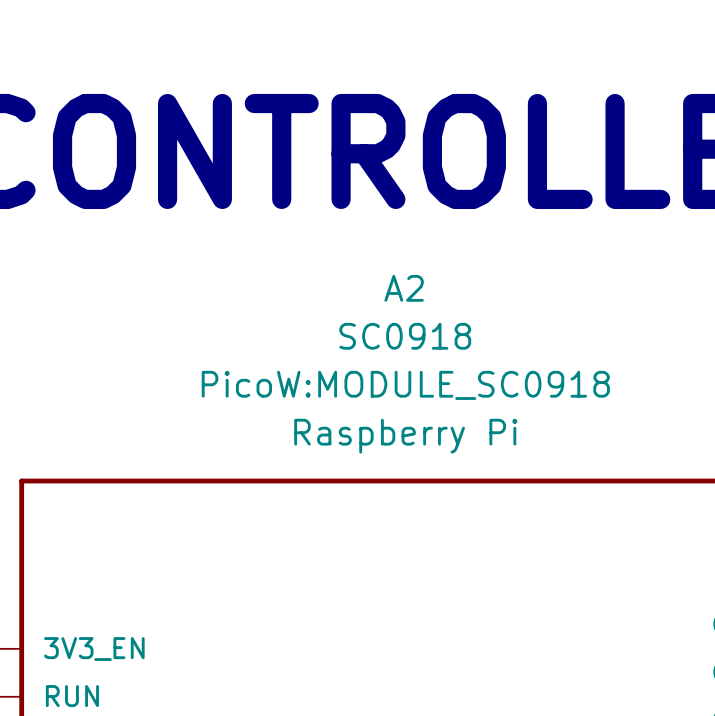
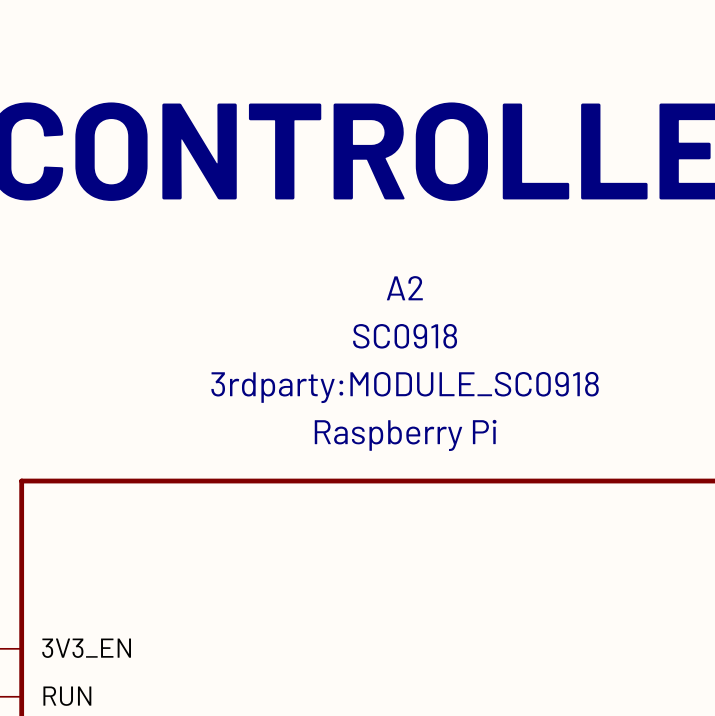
A2 text: PicoW:MODULE_SC0918 (405, 385) -> 3rdparty:MODULE_SC0918 (405, 387)

